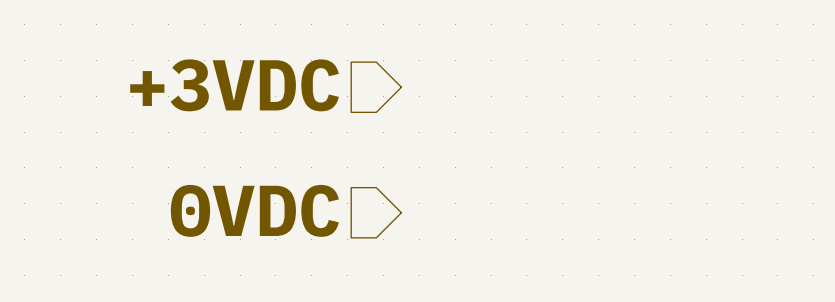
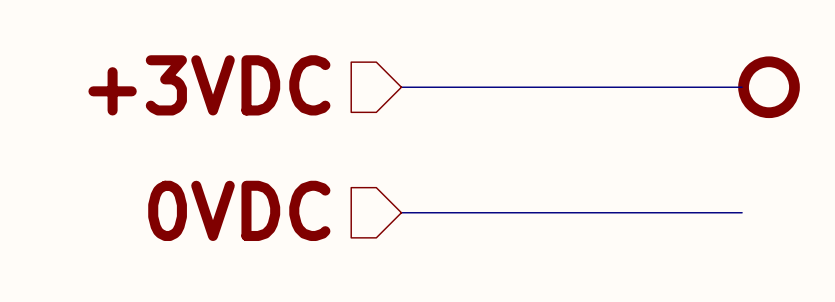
wire: none -> (401, 87) (742, 87)
part: none -> (769, 87)
wire: none -> (401, 212) (742, 212)

